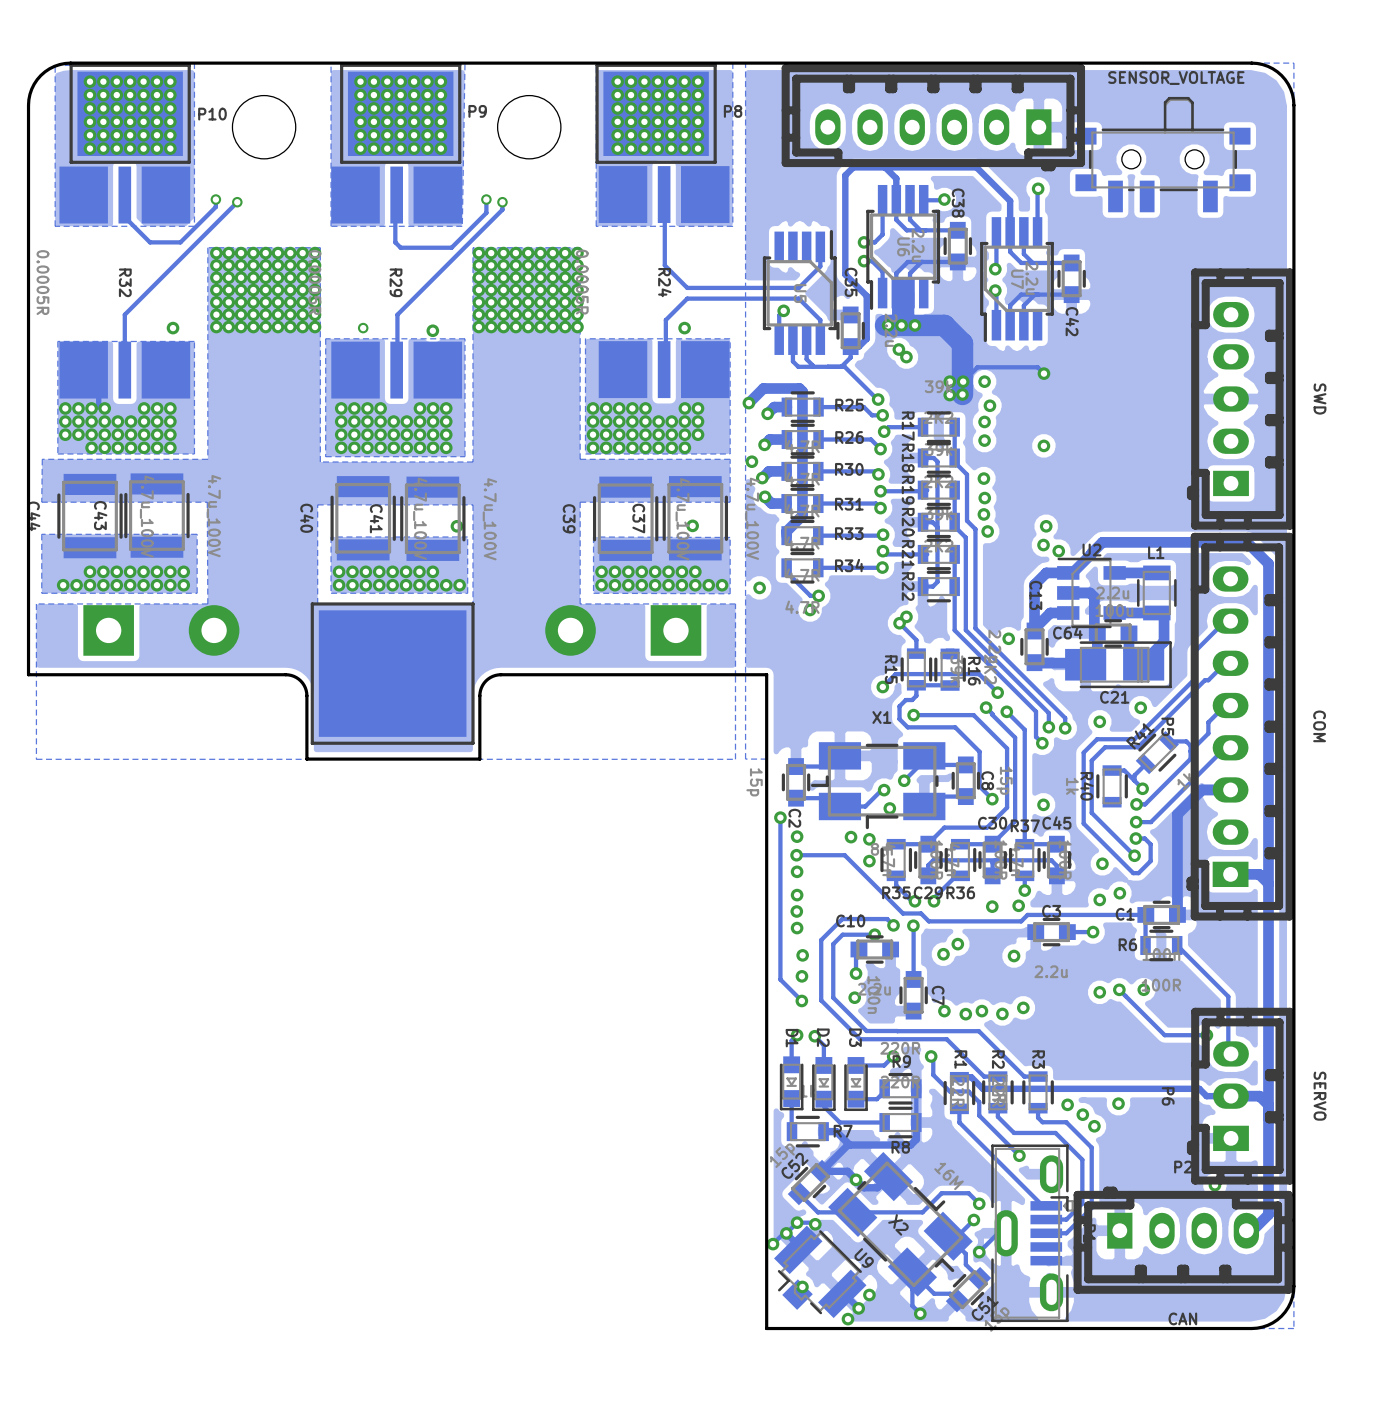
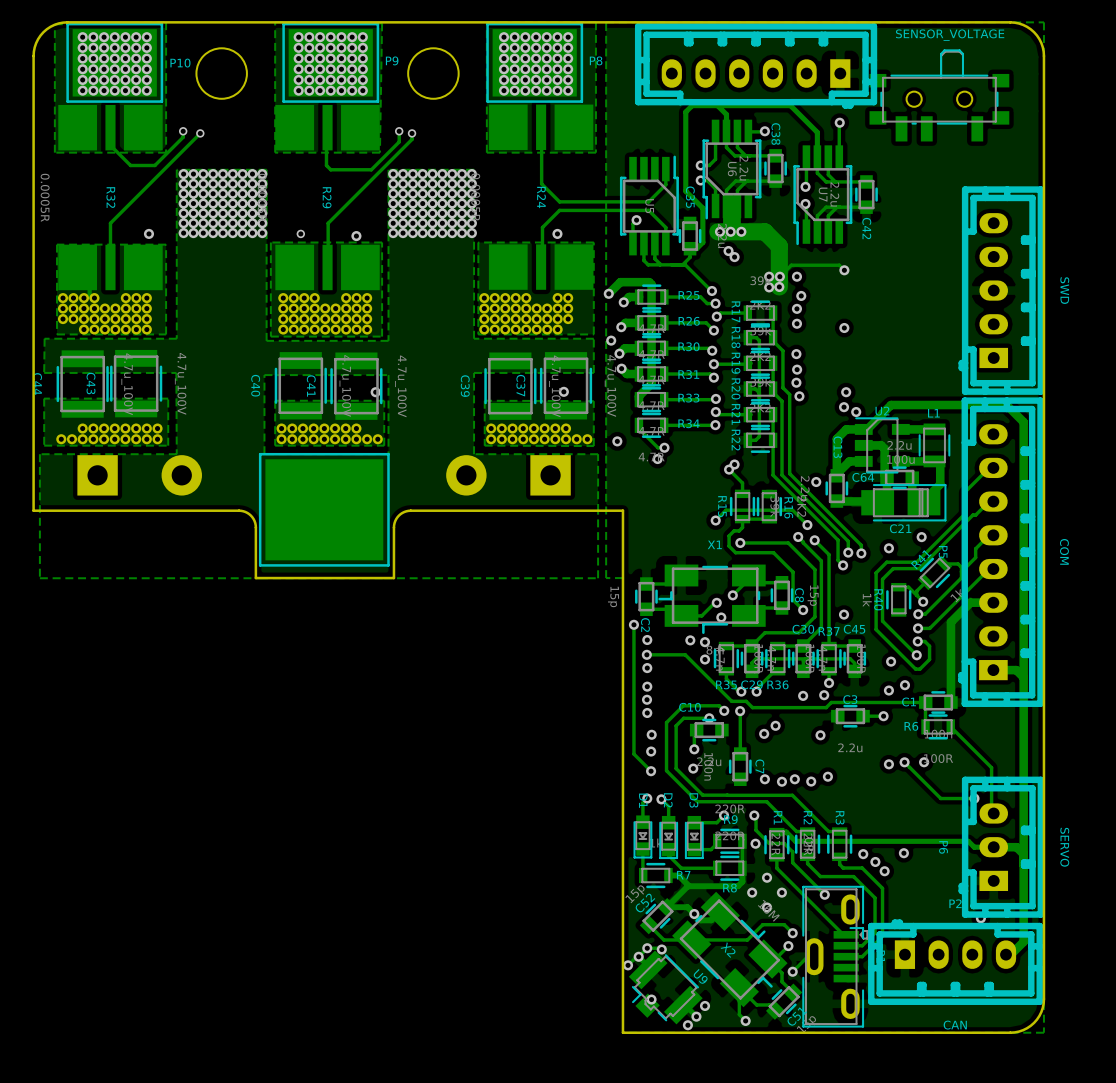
via: none -> (755, 843)
via: none -> (767, 877)
via: none -> (752, 892)
via: none -> (781, 892)
via: none -> (767, 907)

